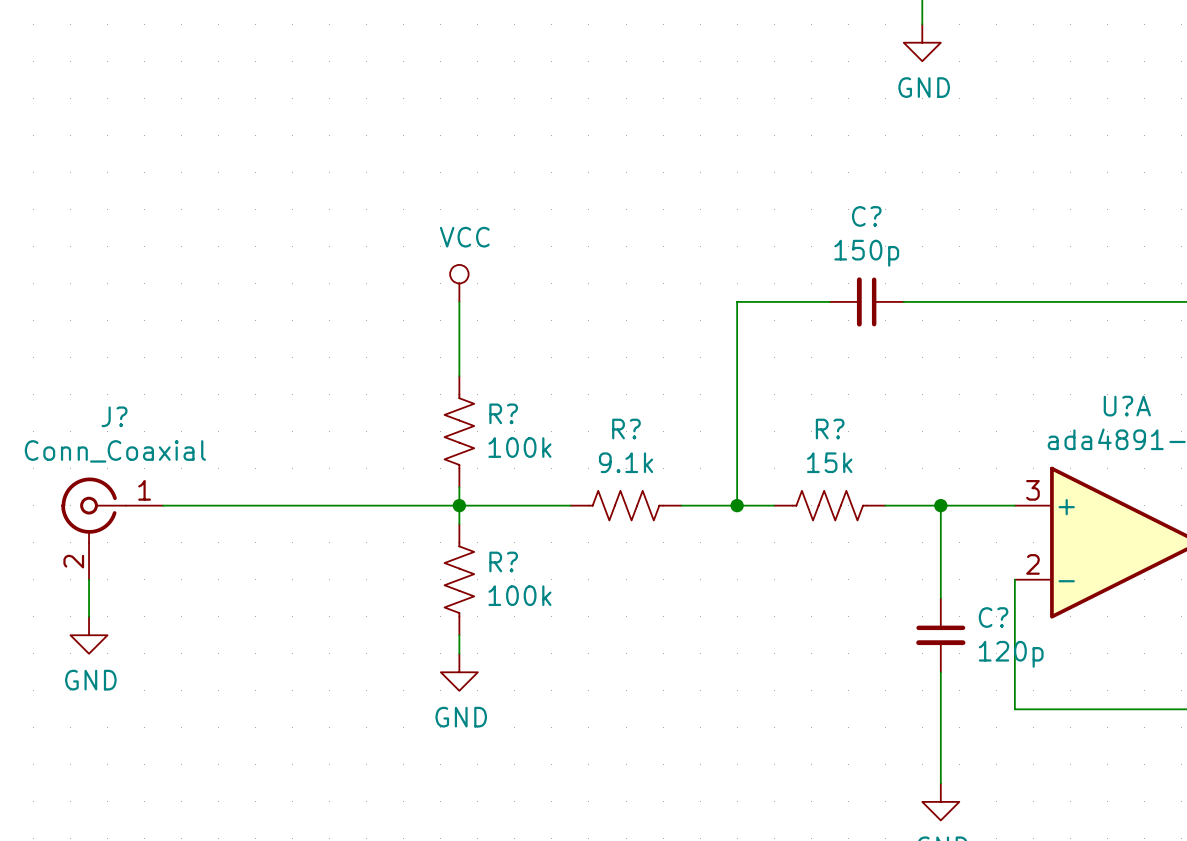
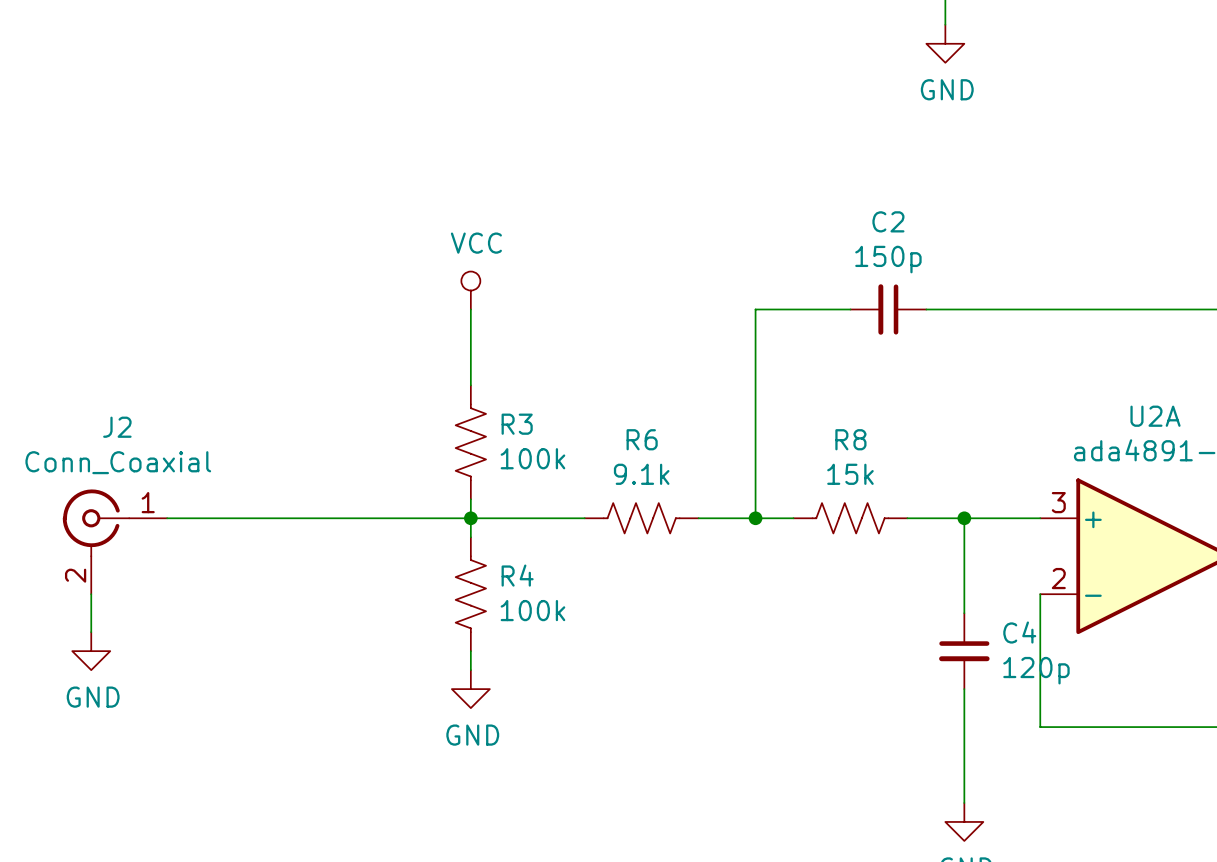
C? name: C? (866, 216) -> C2 (888, 221)
U?A name: U?A (1127, 406) -> U2A (1155, 416)
R? name: R? (503, 413) -> R3 (517, 424)
J? name: J? (114, 416) -> J2 (117, 427)
R? name: R? (626, 429) -> R6 (642, 439)
R? name: R? (830, 429) -> R8 (850, 439)
R? name: R? (503, 561) -> R4 (517, 575)
C? name: C? (993, 617) -> C4 (1019, 632)

